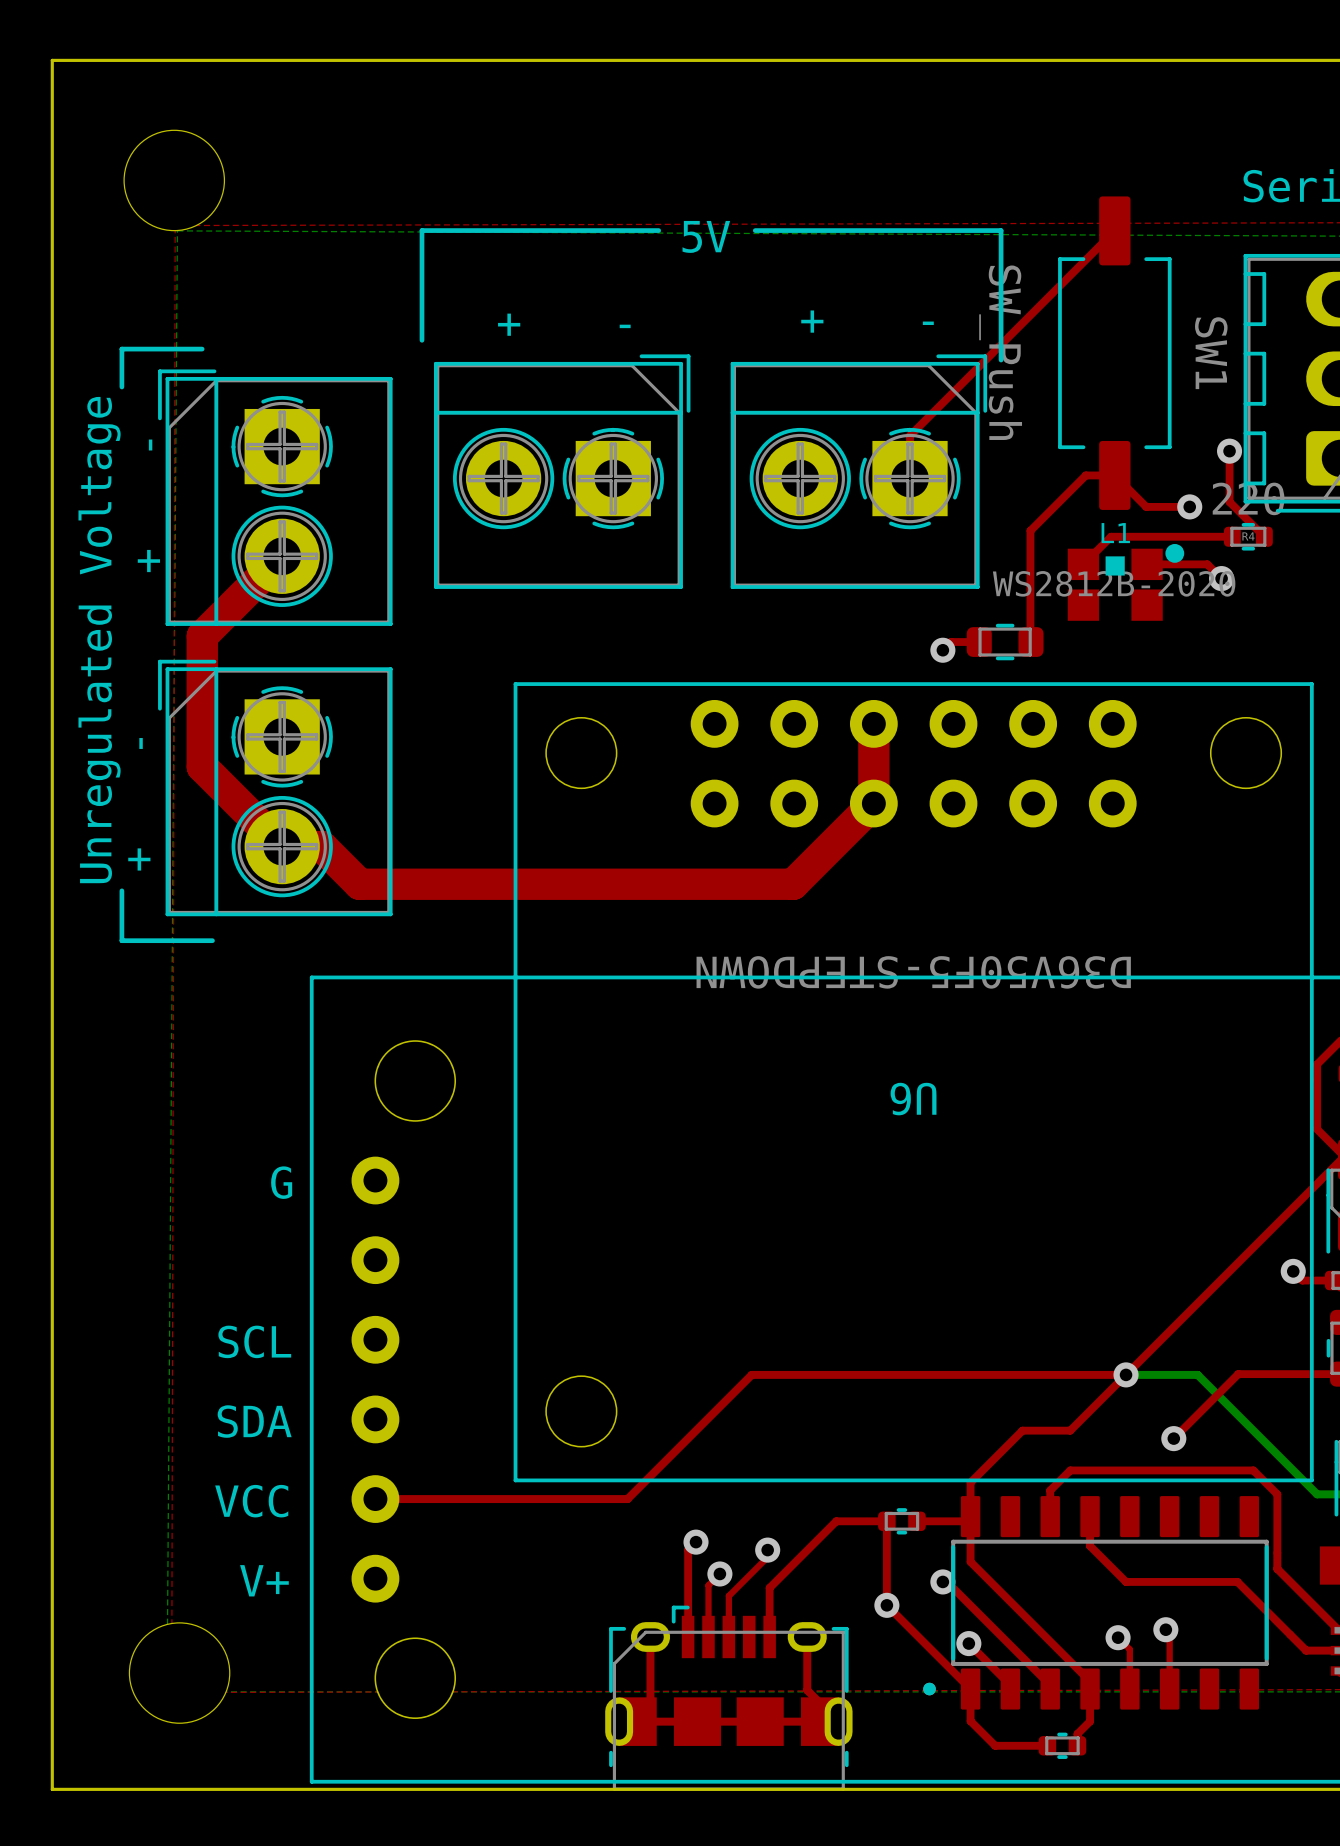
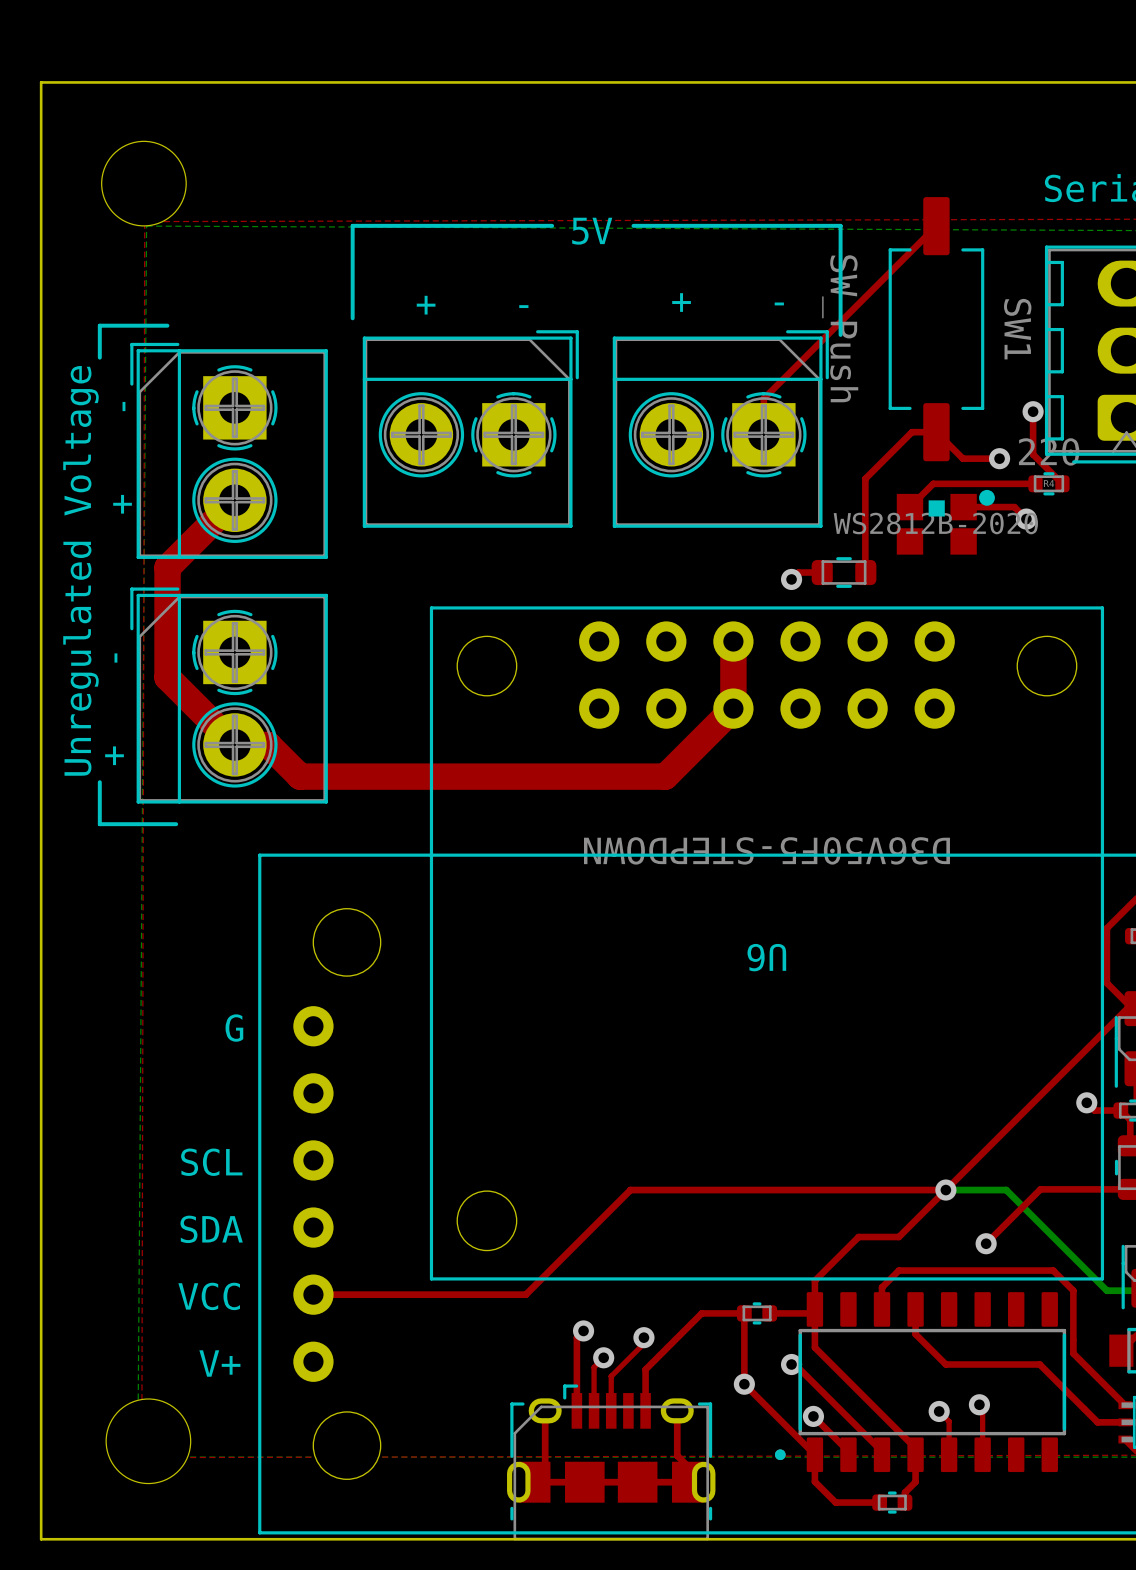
L1 name: L1 (1115, 533) -> none

